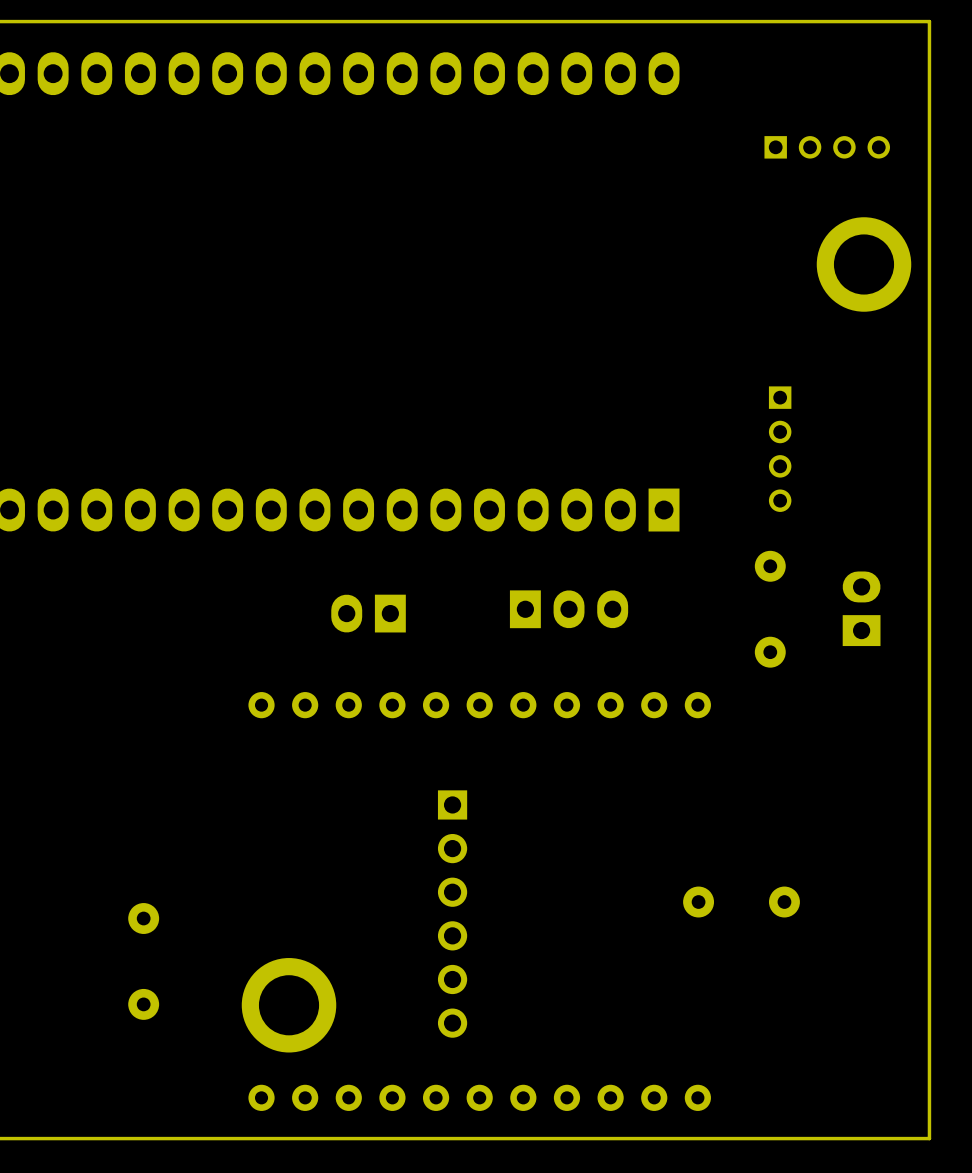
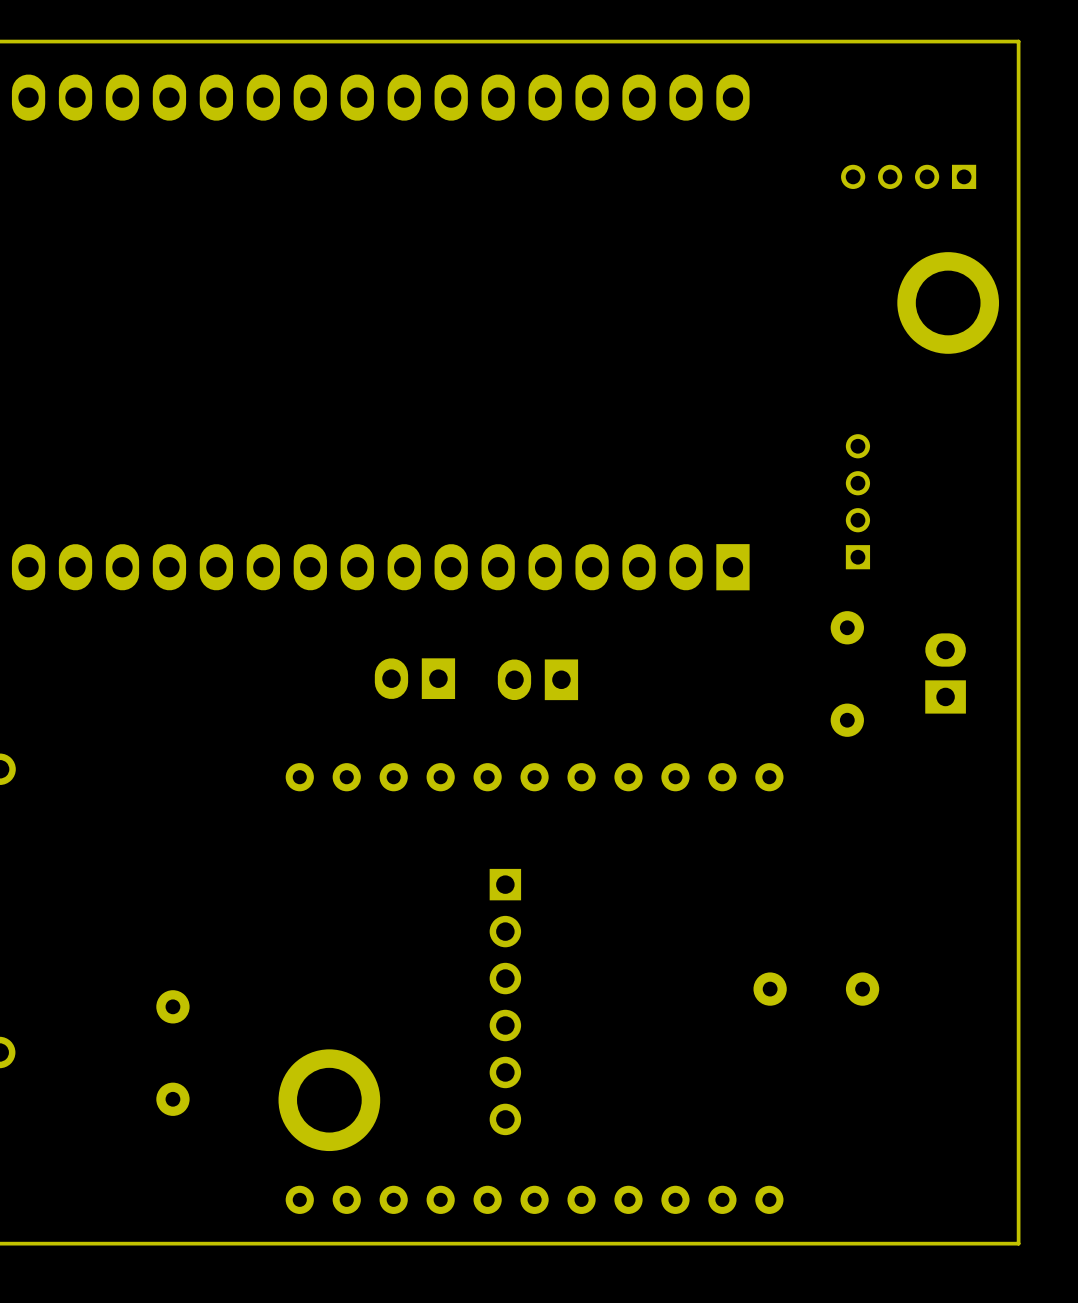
part rotation: 0° (827, 147) -> 180° (908, 176)
part rotation: 0° (780, 449) -> 180° (857, 501)
part: (569, 609) -> none
part: none -> (537, 679)

